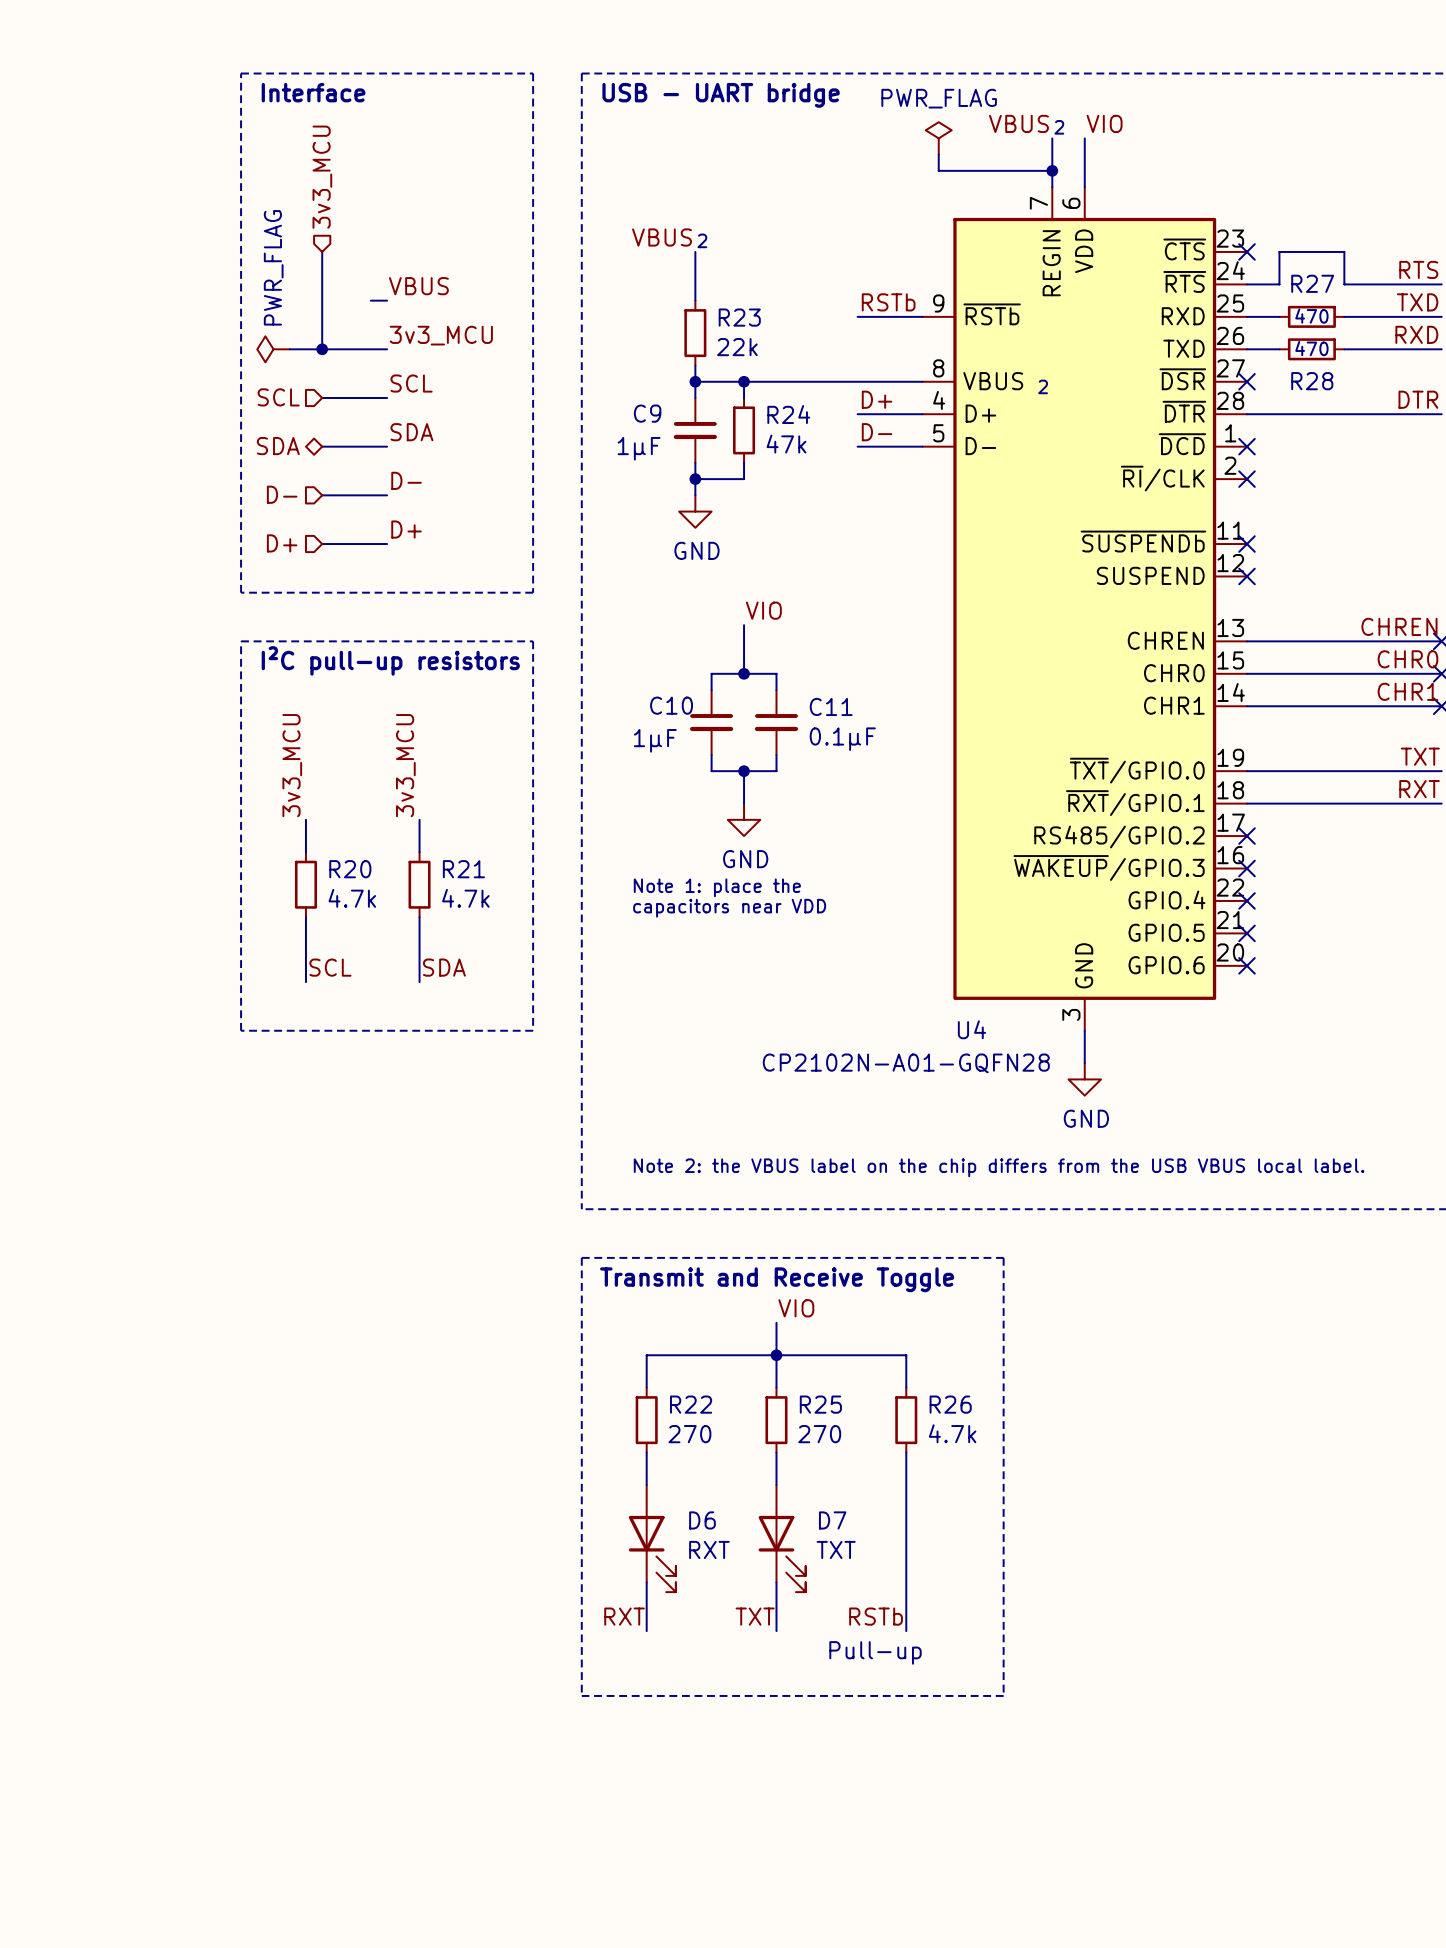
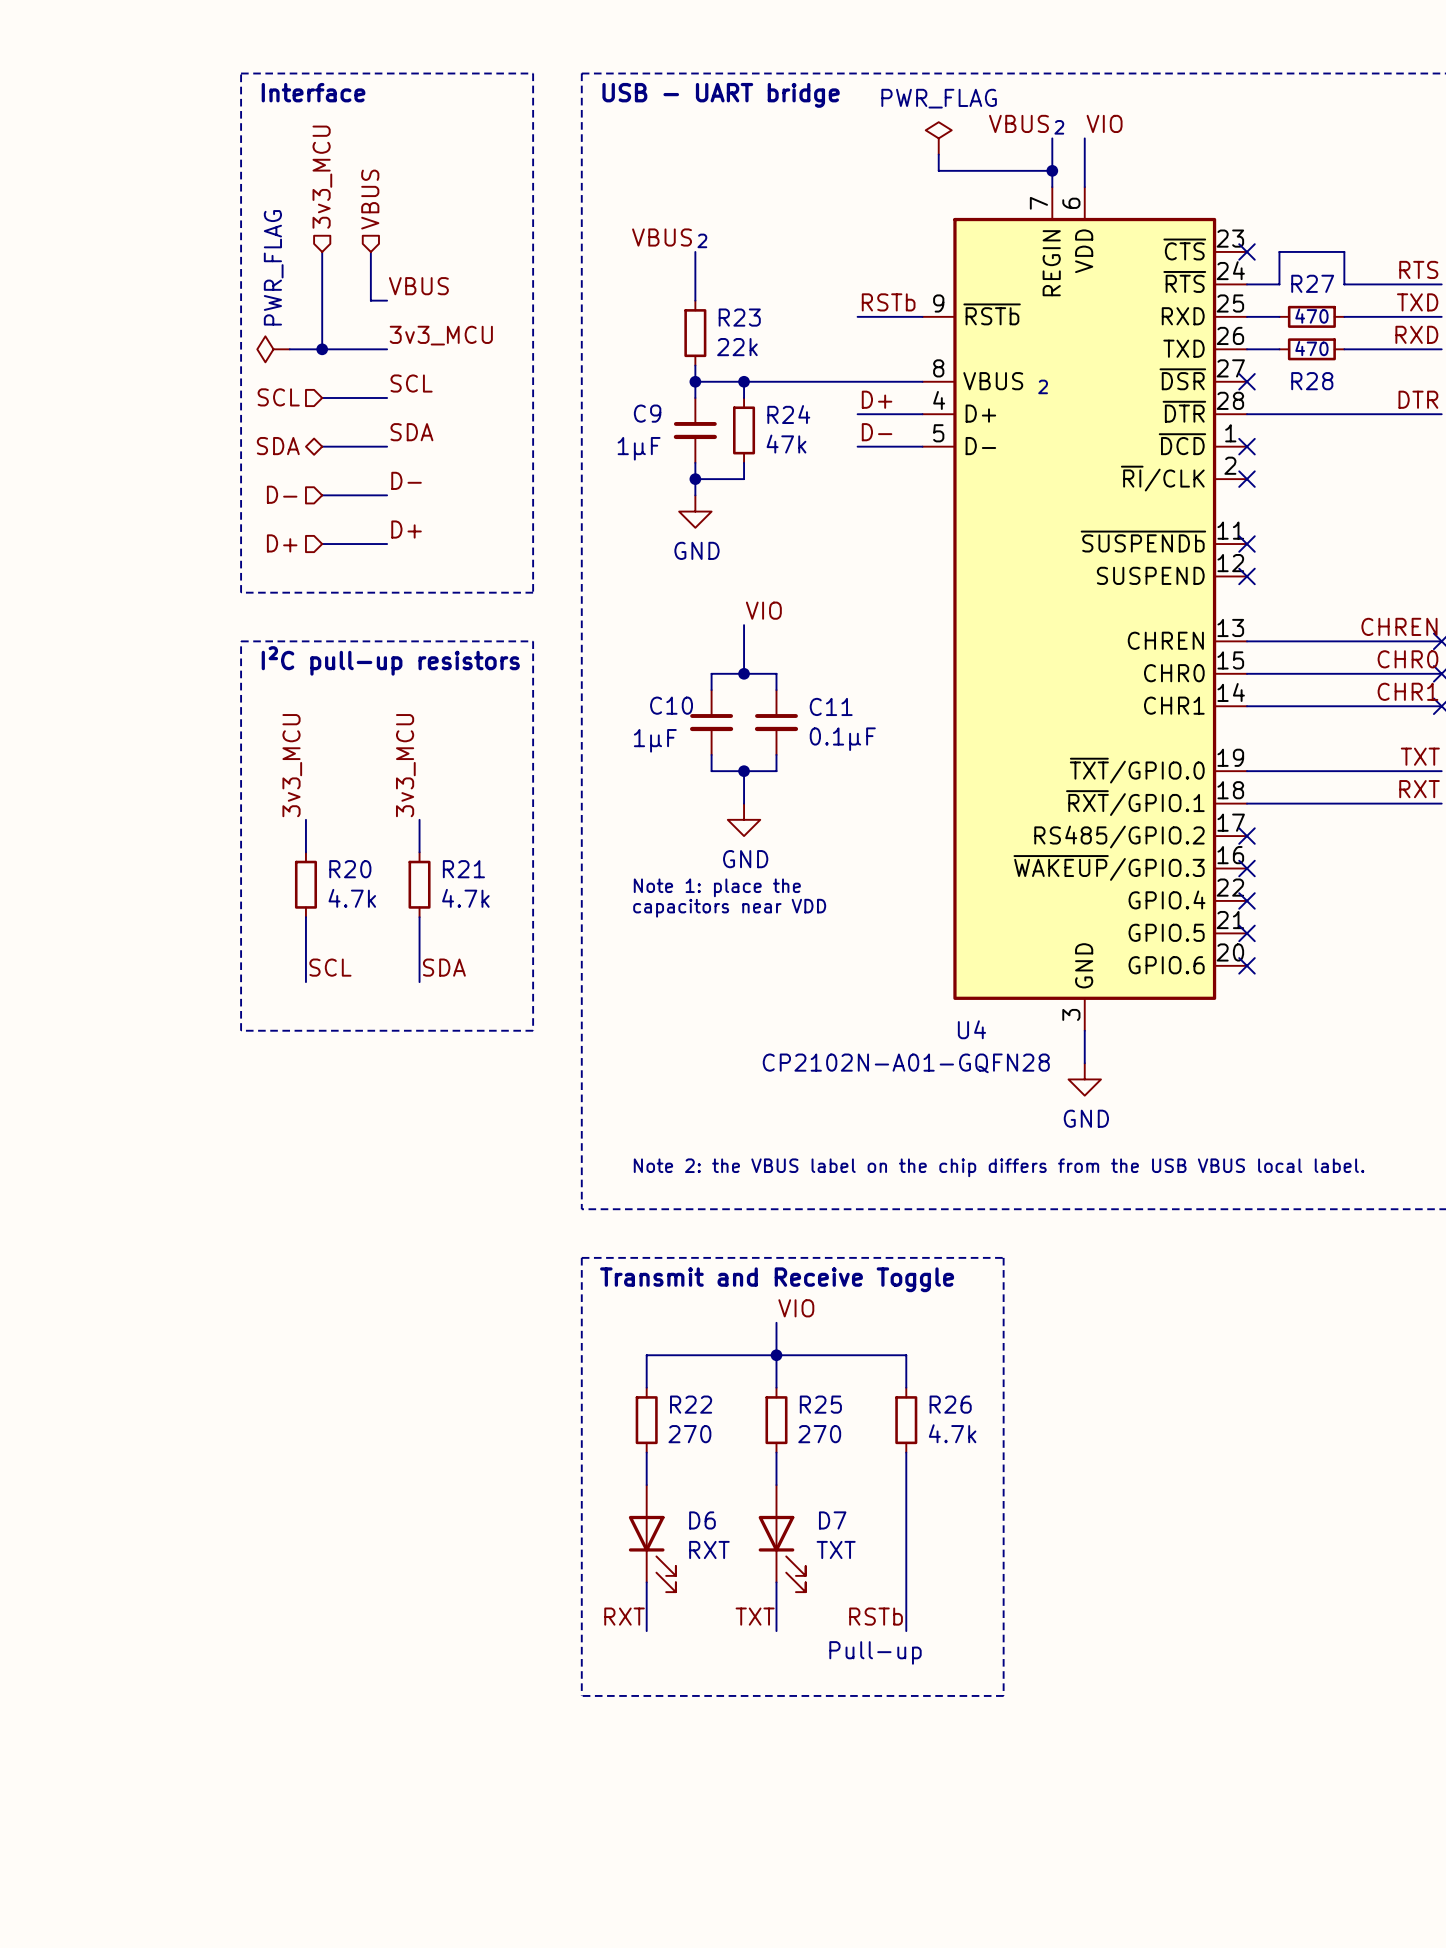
hierarchical label: none -> VBUS (370, 199)
wire: none -> (370, 251) (370, 300)

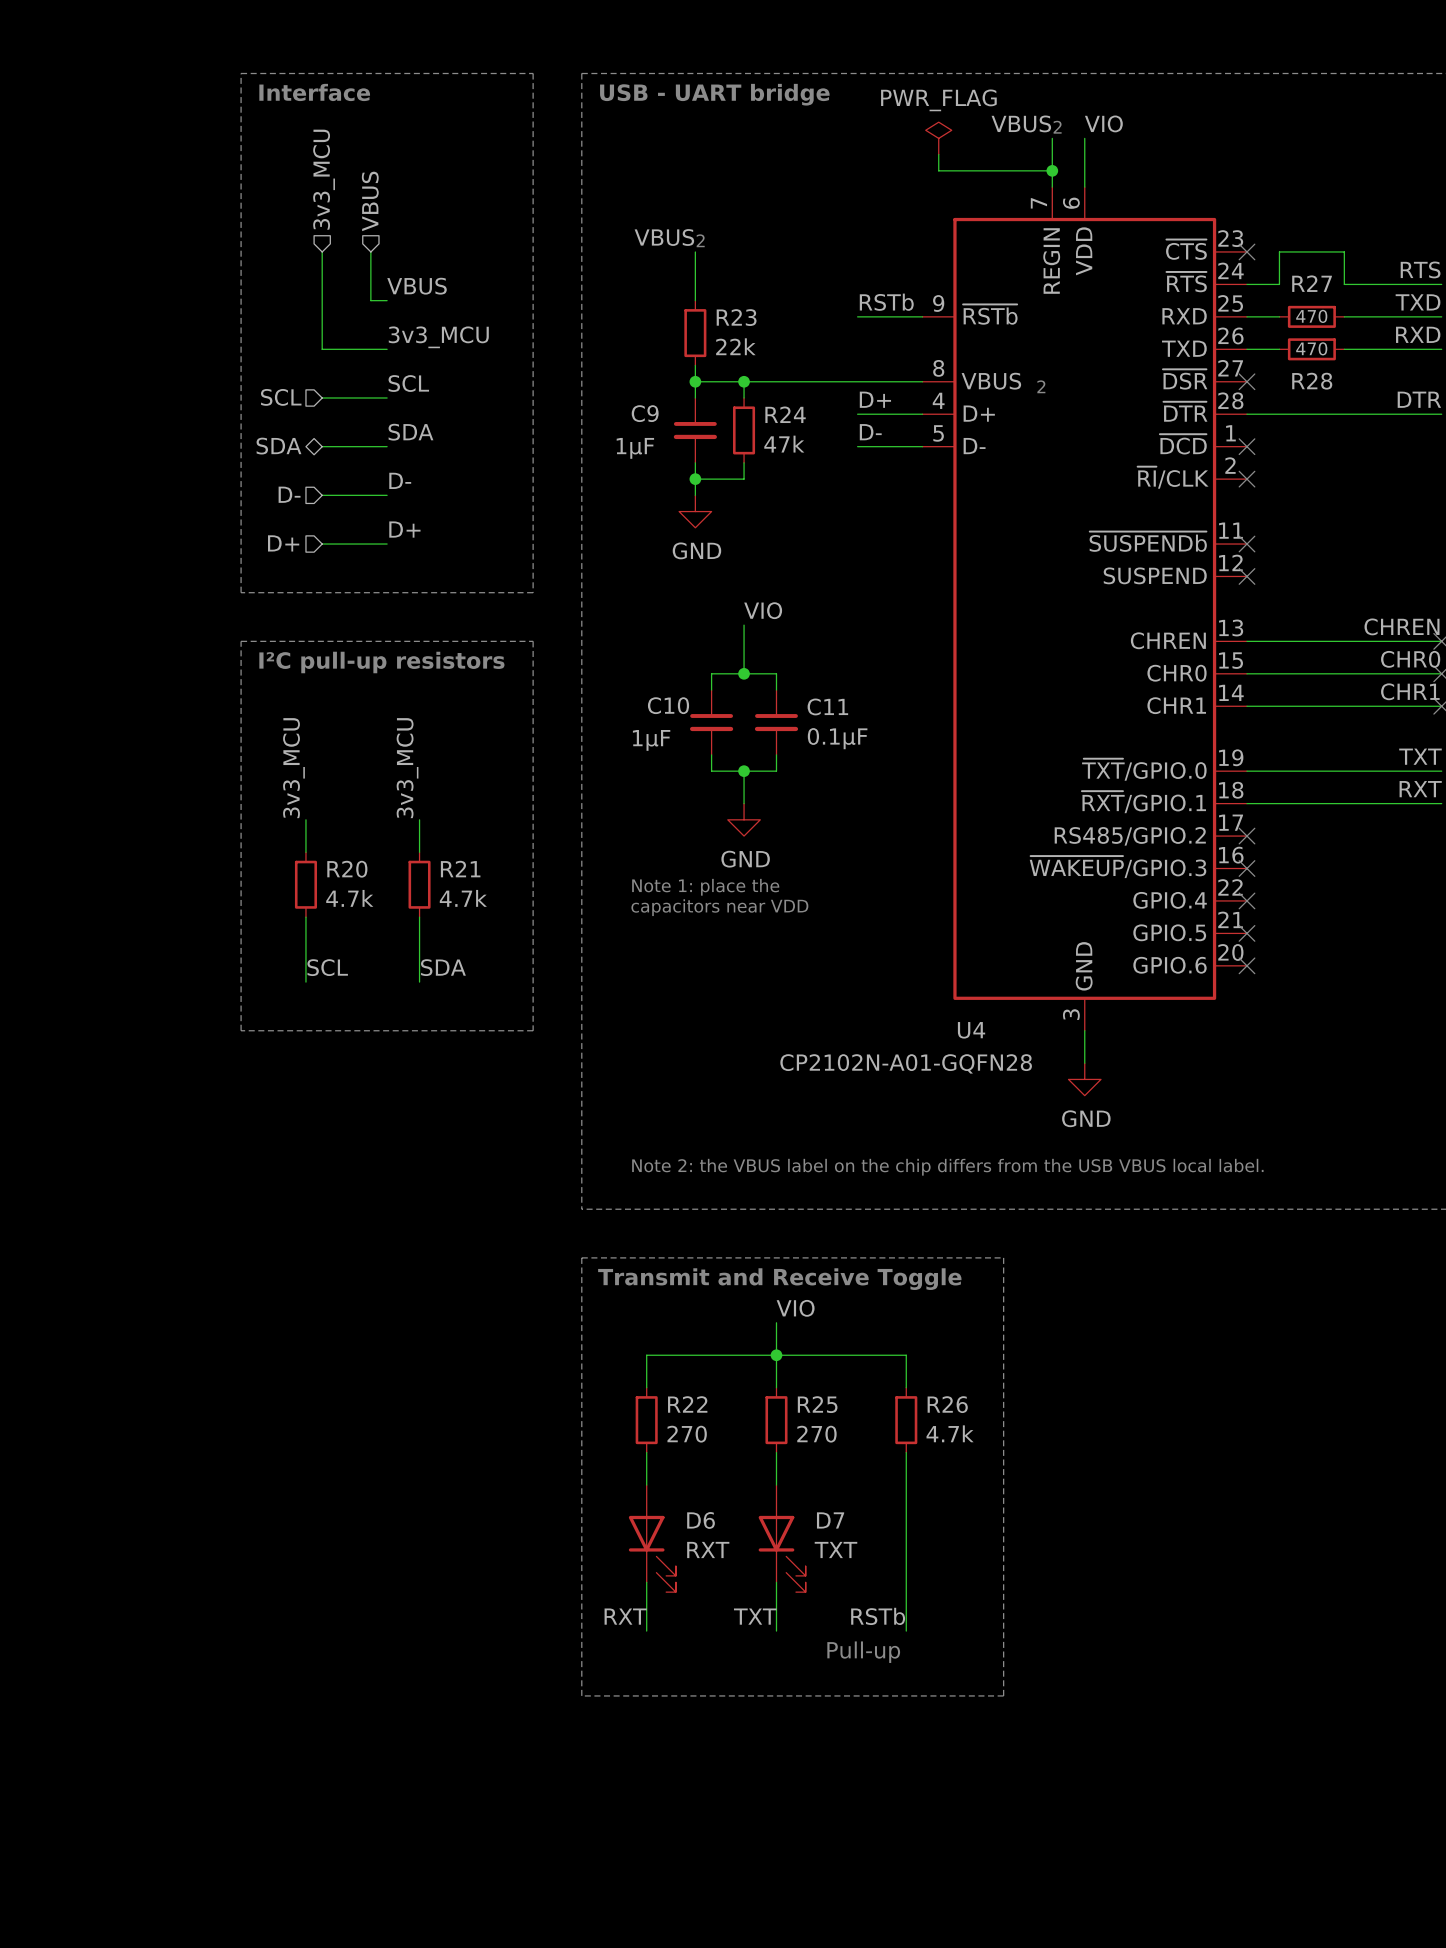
power symbol: PWR_FLAG (273, 349) -> none
wire: (289, 349) (322, 349) -> none
junction: (322, 349) -> none

